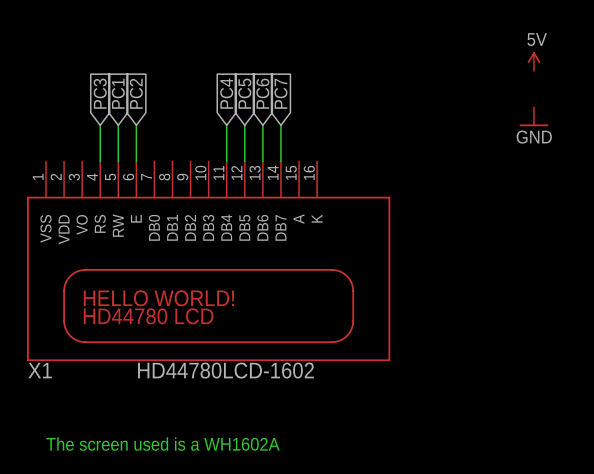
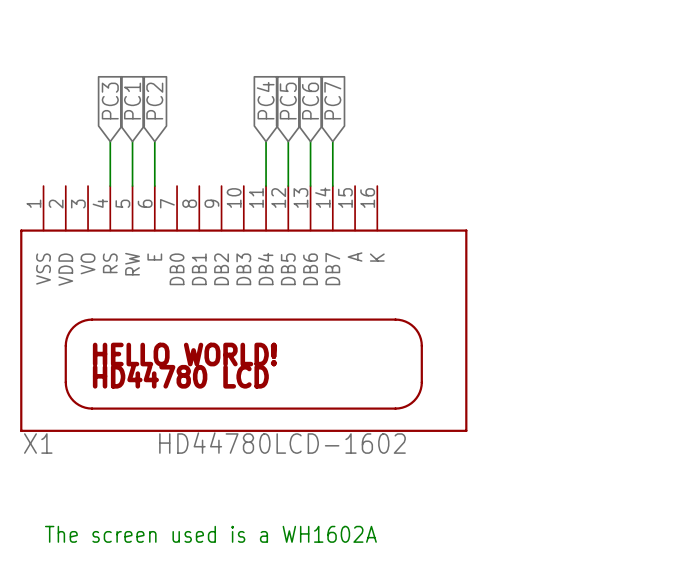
power symbol: 5V (533, 61) -> none
power symbol: GND (533, 116) -> none

